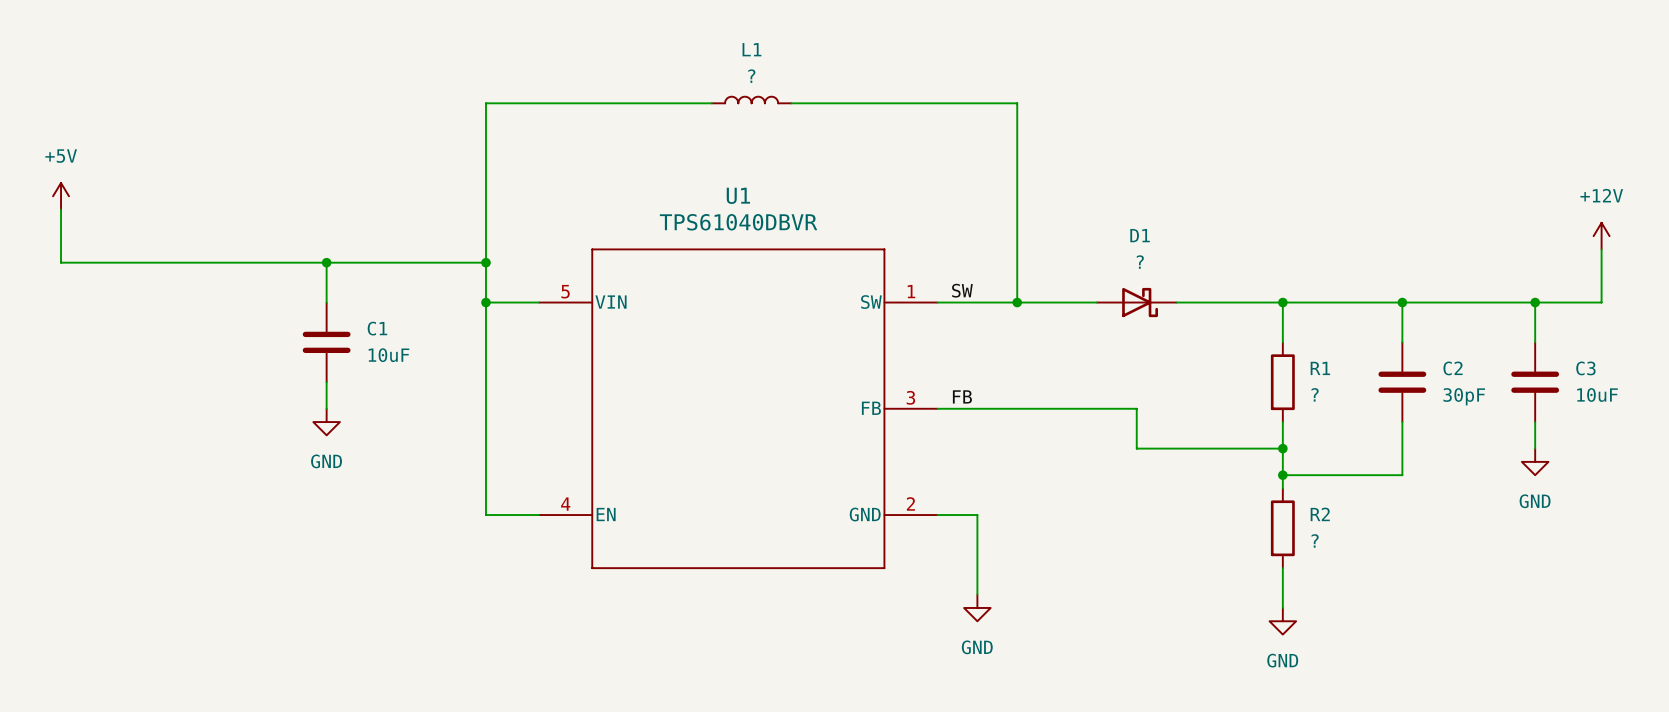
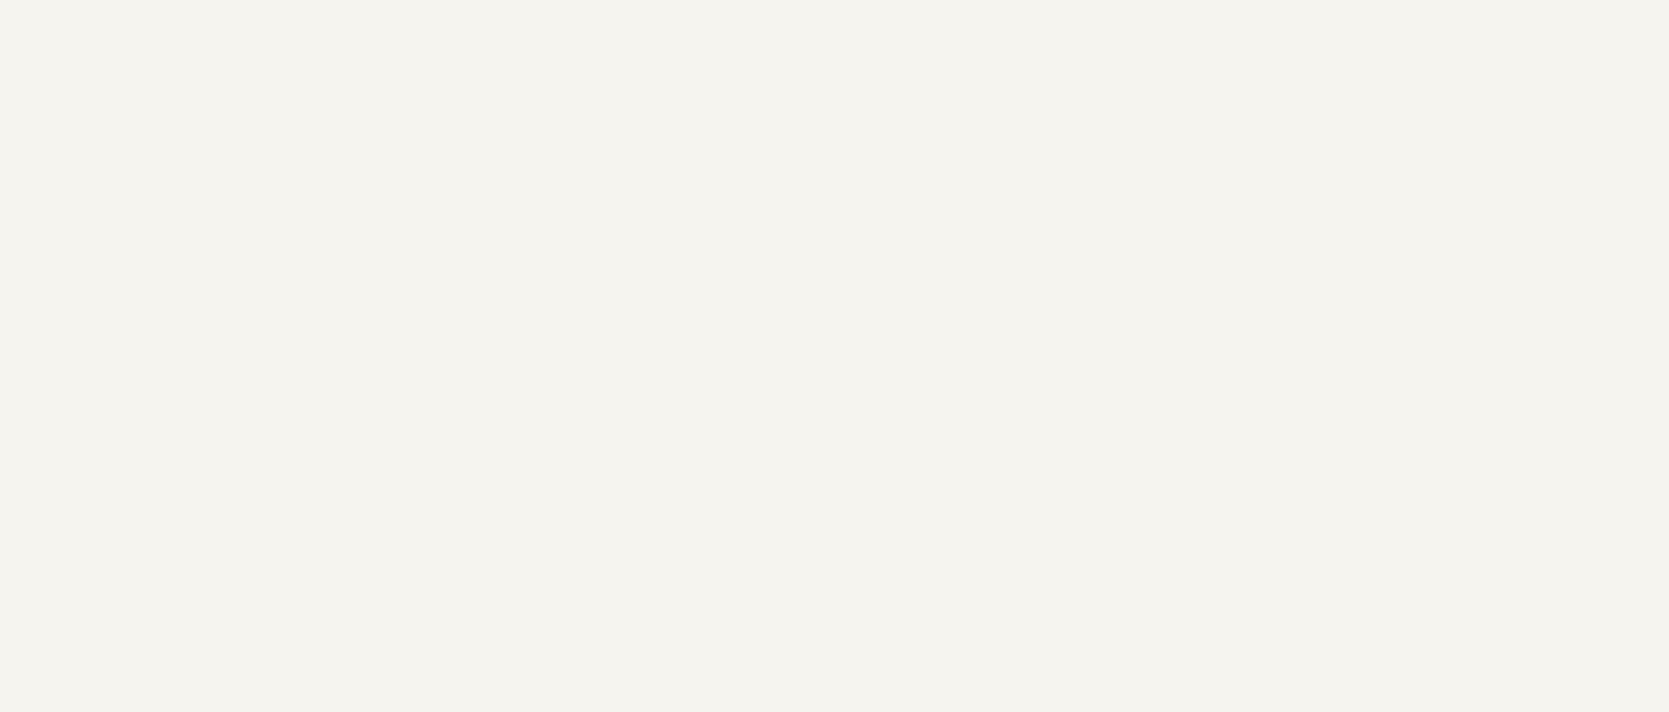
L1: ? (751, 100) -> none
wire: (711, 103) (486, 103) (486, 515) (539, 515) -> none
wire: (791, 103) (1017, 103) (1017, 302) -> none
power symbol: +5V (61, 196) -> none
wire: (61, 209) (61, 262) (486, 262) -> none
power symbol: +12V (1601, 236) -> none
wire: (1601, 249) (1601, 302) (1176, 302) -> none
wire: (326, 262) (326, 302) -> none
junction: (326, 262) -> none
junction: (486, 262) -> none
label: SW (962, 290) -> none
wire: (486, 302) (539, 302) -> none
junction: (486, 302) -> none
wire: (937, 302) (1096, 302) -> none
junction: (1017, 302) -> none
D1: ? (1136, 302) -> none
wire: (1282, 302) (1282, 342) -> none
junction: (1282, 302) -> none
wire: (1402, 302) (1402, 342) -> none
junction: (1402, 302) -> none
wire: (1535, 302) (1535, 342) -> none
junction: (1535, 302) -> none
C1: 10uF (326, 342) -> none
wire: (326, 382) (326, 408) -> none
R1: ? (1282, 382) -> none
C2: 30pF (1402, 382) -> none
C3: 10uF (1535, 382) -> none
label: FB (962, 396) -> none
U1: TPS61040DBVR (738, 408) -> none
wire: (937, 408) (1136, 408) (1136, 448) (1282, 448) -> none
power symbol: GND (326, 422) -> none
wire: (1282, 422) (1282, 488) -> none
wire: (1402, 422) (1402, 475) (1282, 475) -> none
wire: (1535, 422) (1535, 448) -> none
junction: (1282, 448) -> none
power symbol: GND (1535, 461) -> none
junction: (1282, 475) -> none
wire: (937, 515) (977, 515) (977, 594) -> none
R2: ? (1282, 528) -> none
wire: (1282, 568) (1282, 607) -> none
power symbol: GND (977, 607) -> none
power symbol: GND (1282, 621) -> none

